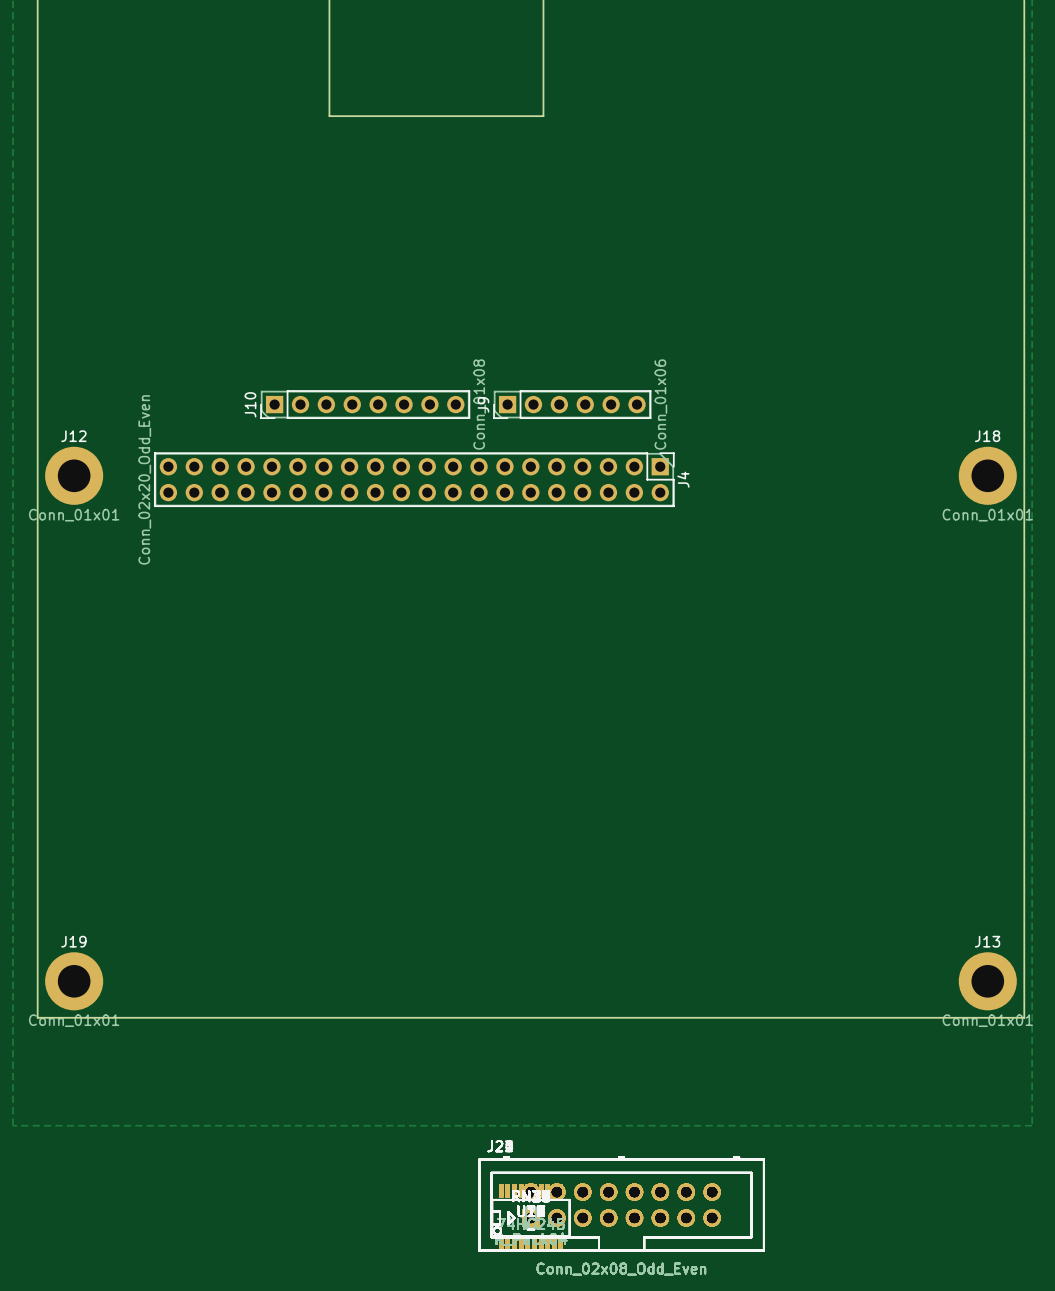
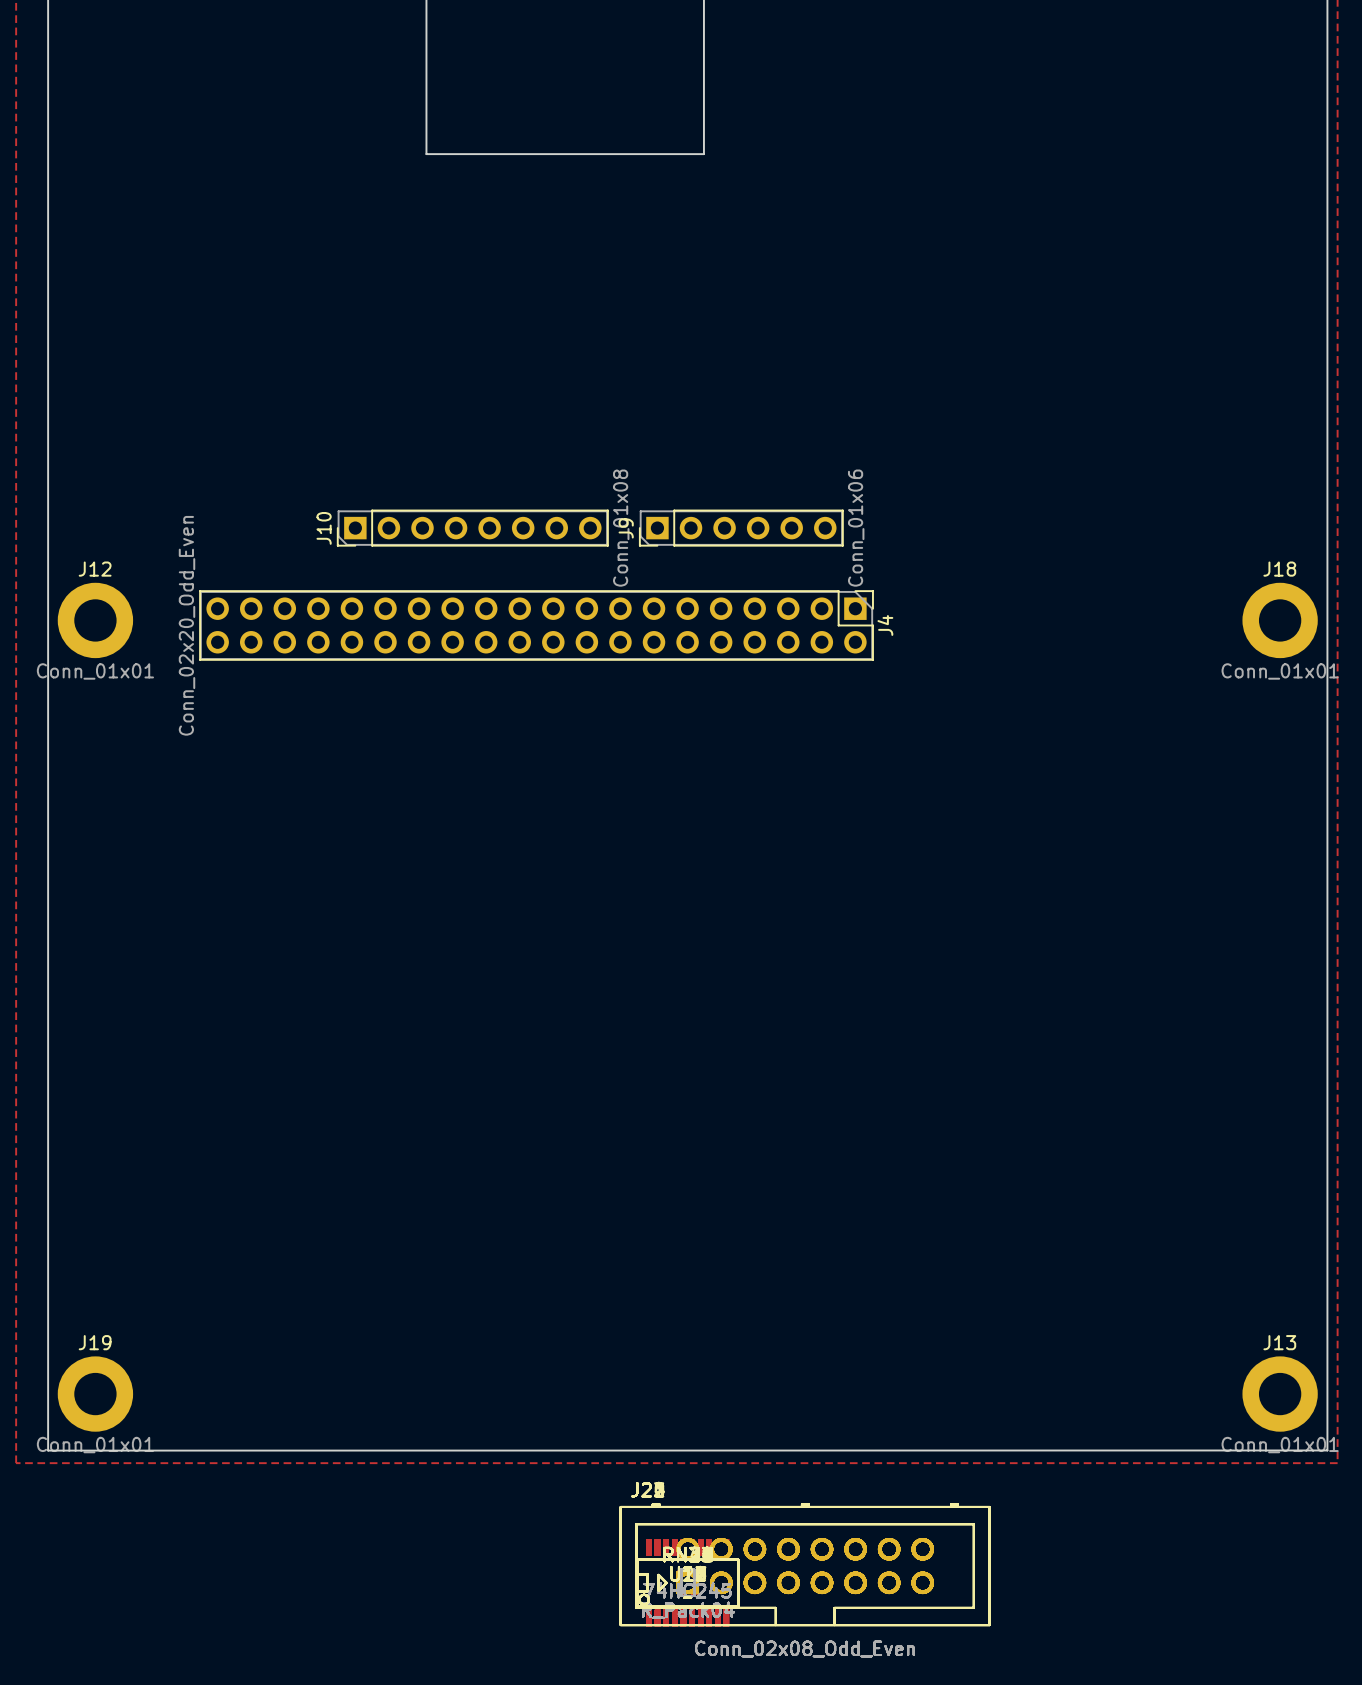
J19 position: (74, 981) -> (95, 1394)
J13 position: (987, 981) -> (1280, 1394)
board edge: (37, 1017) (1024, 1017) -> (48, 1450) (1327, 1450) (1327, 1323)
board edge: none -> (48, 1323) (48, 1450)

